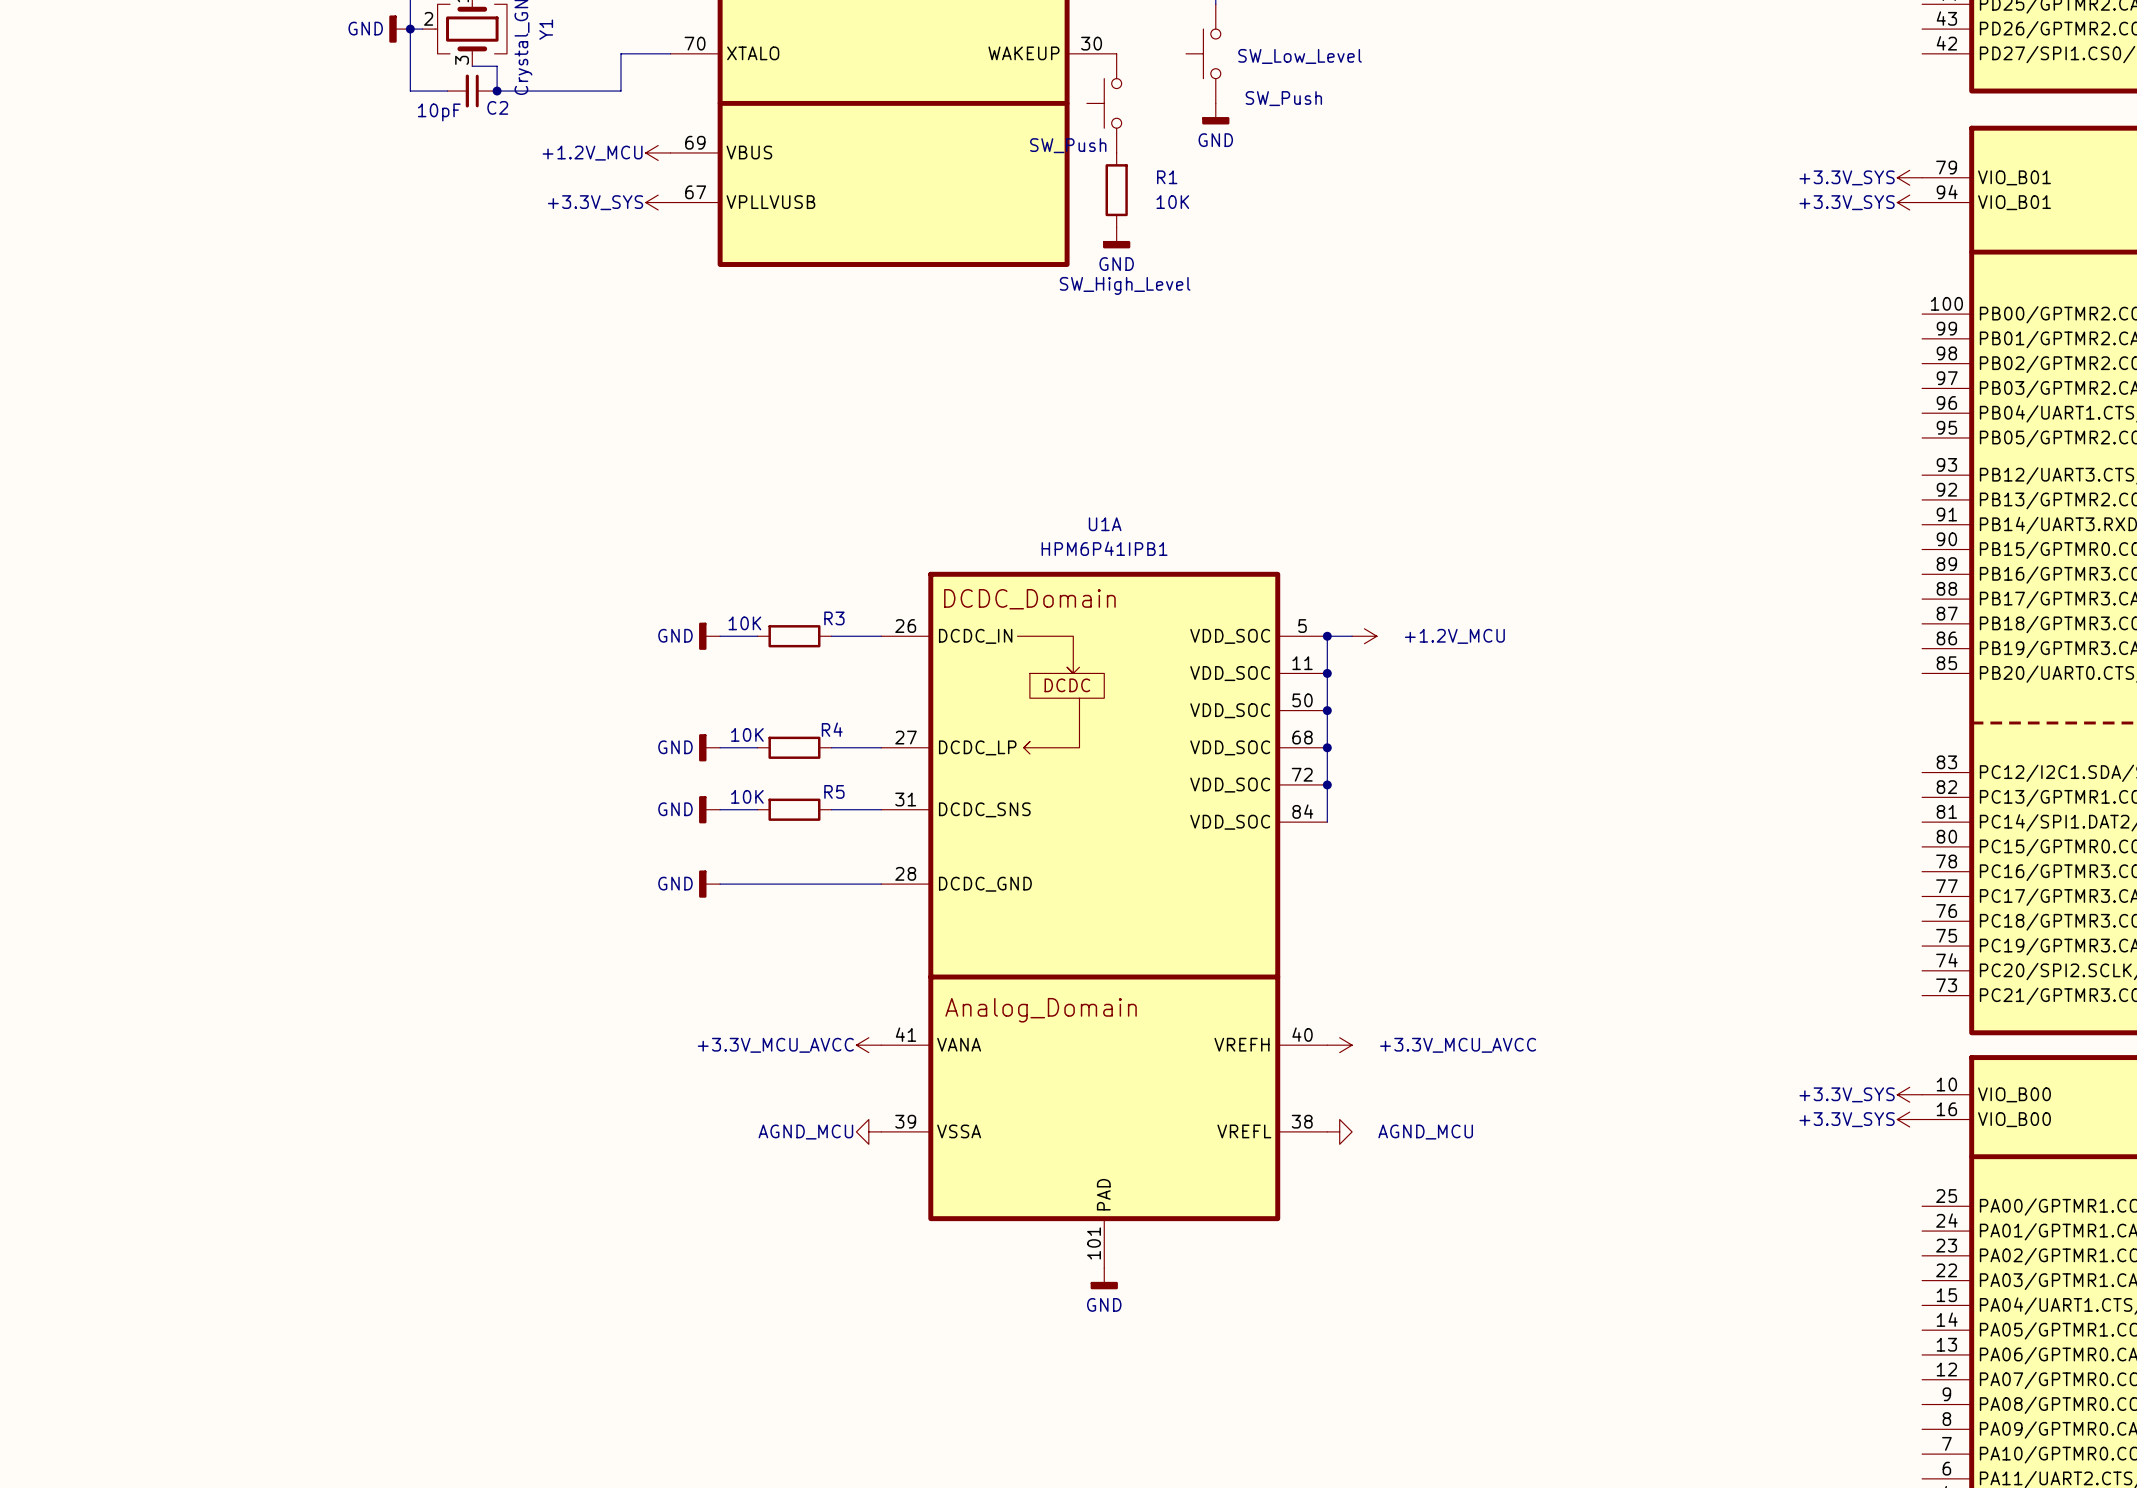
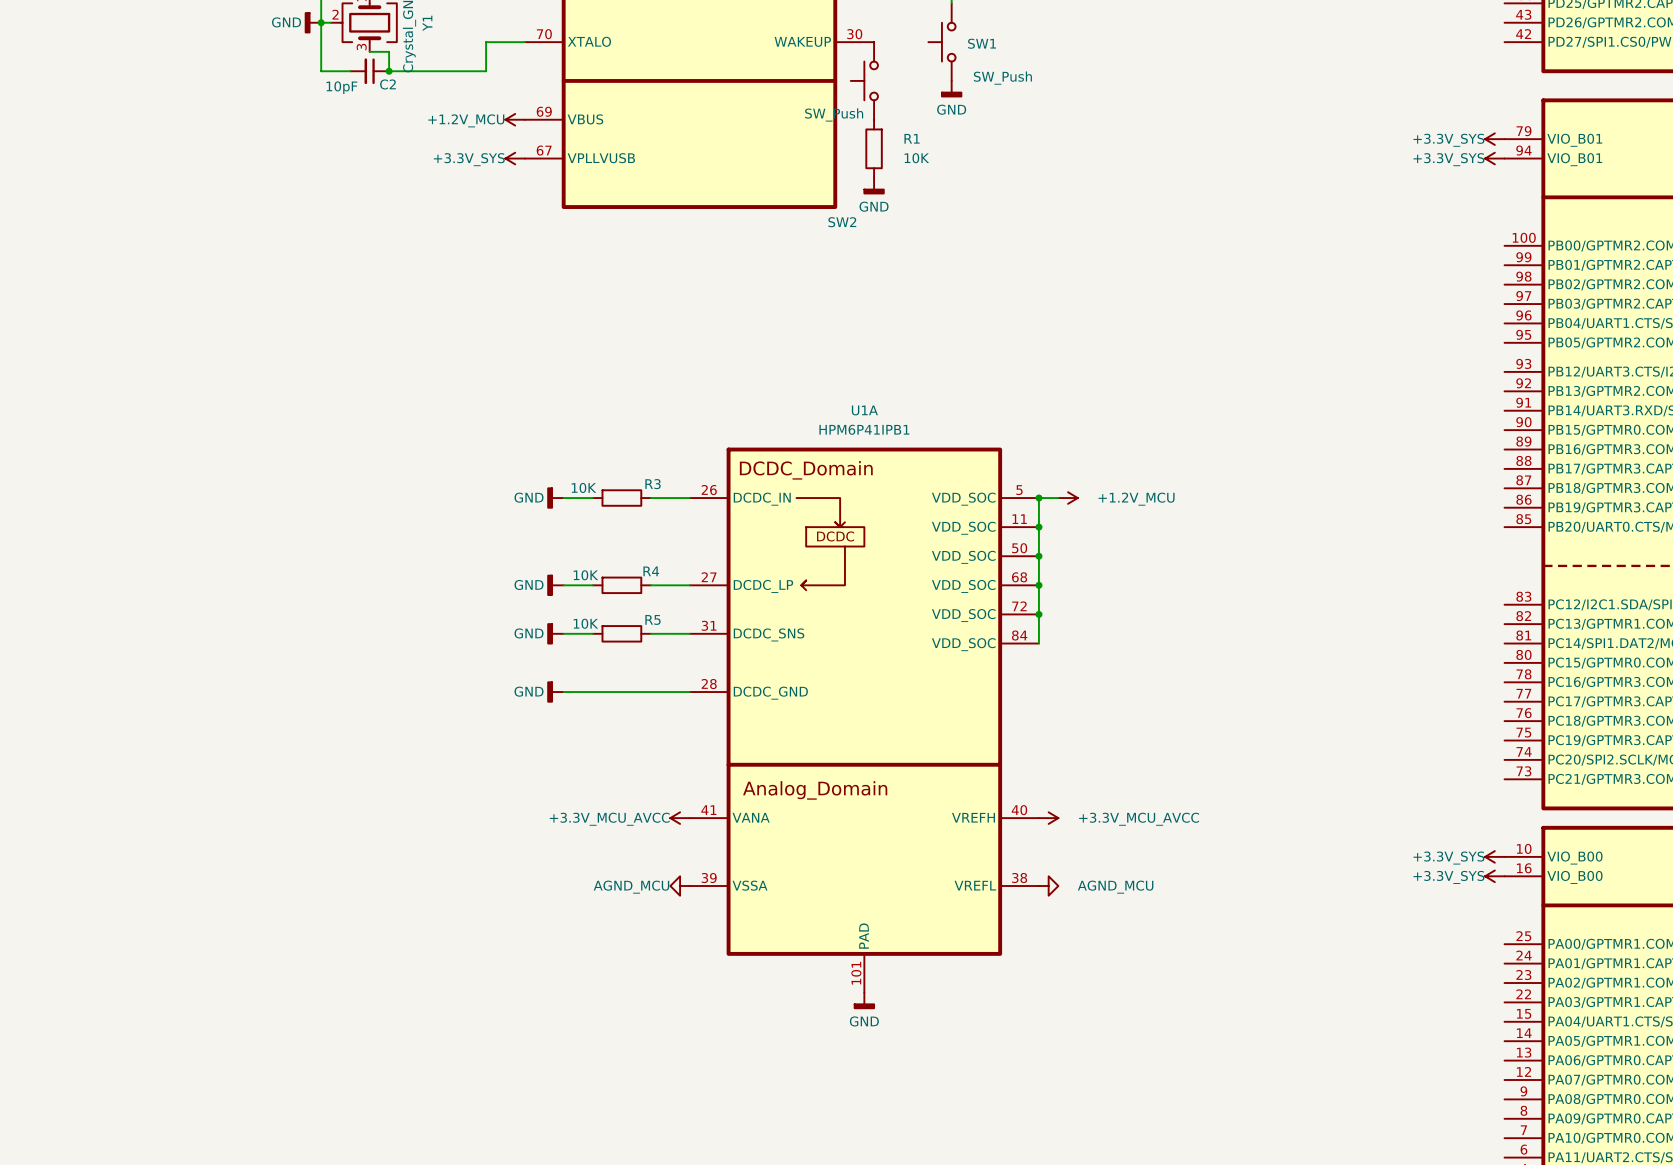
SW_Low_Level name: SW_Low_Level (1300, 56) -> SW1 (982, 43)
SW_High_Level name: SW_High_Level (1125, 285) -> SW2 (842, 222)

